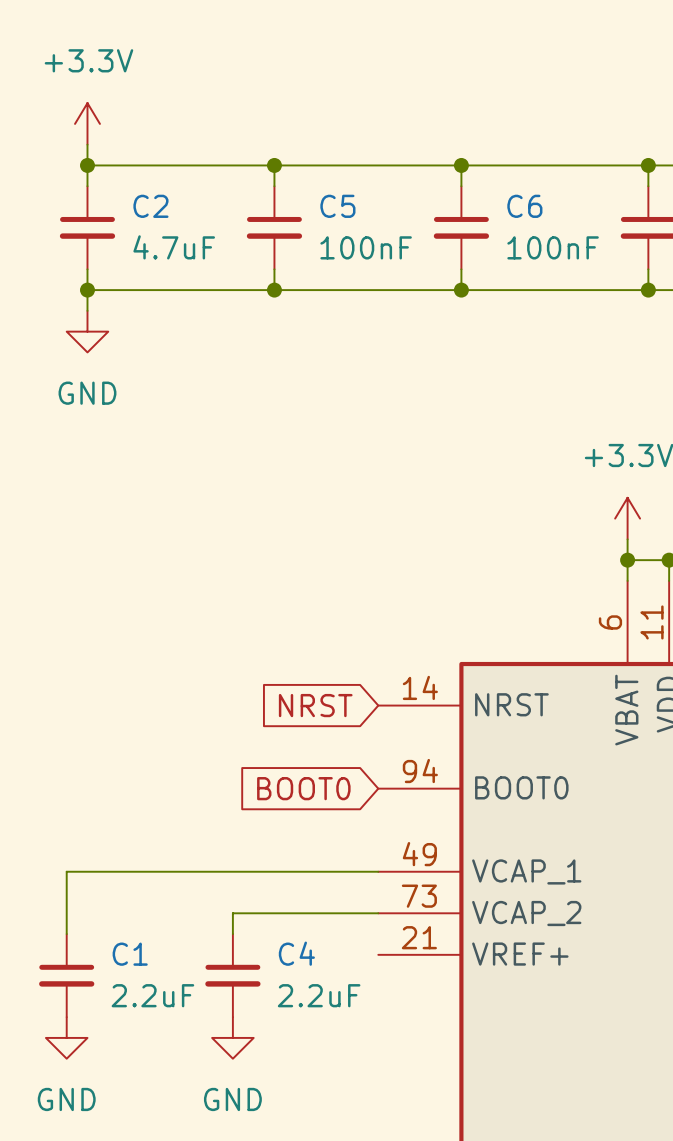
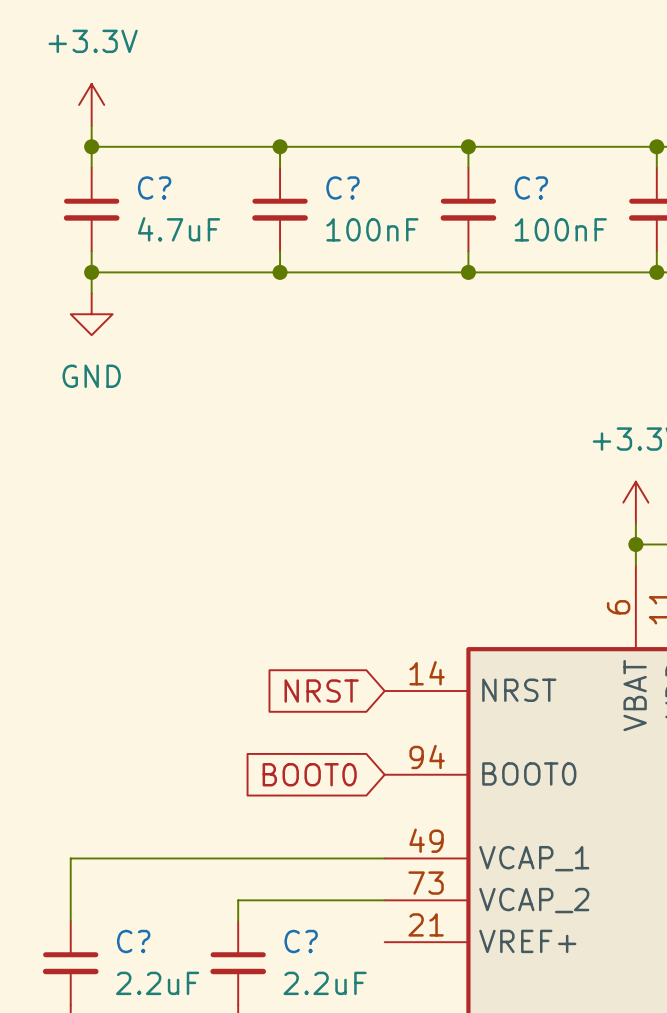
C2 name: C2 (150, 206) -> C? (154, 187)
C5 name: C5 (337, 206) -> C? (343, 187)
C6 name: C6 (524, 206) -> C? (531, 187)
C4 name: C4 (296, 953) -> C? (301, 941)
C1 name: C1 (130, 954) -> C? (133, 941)

